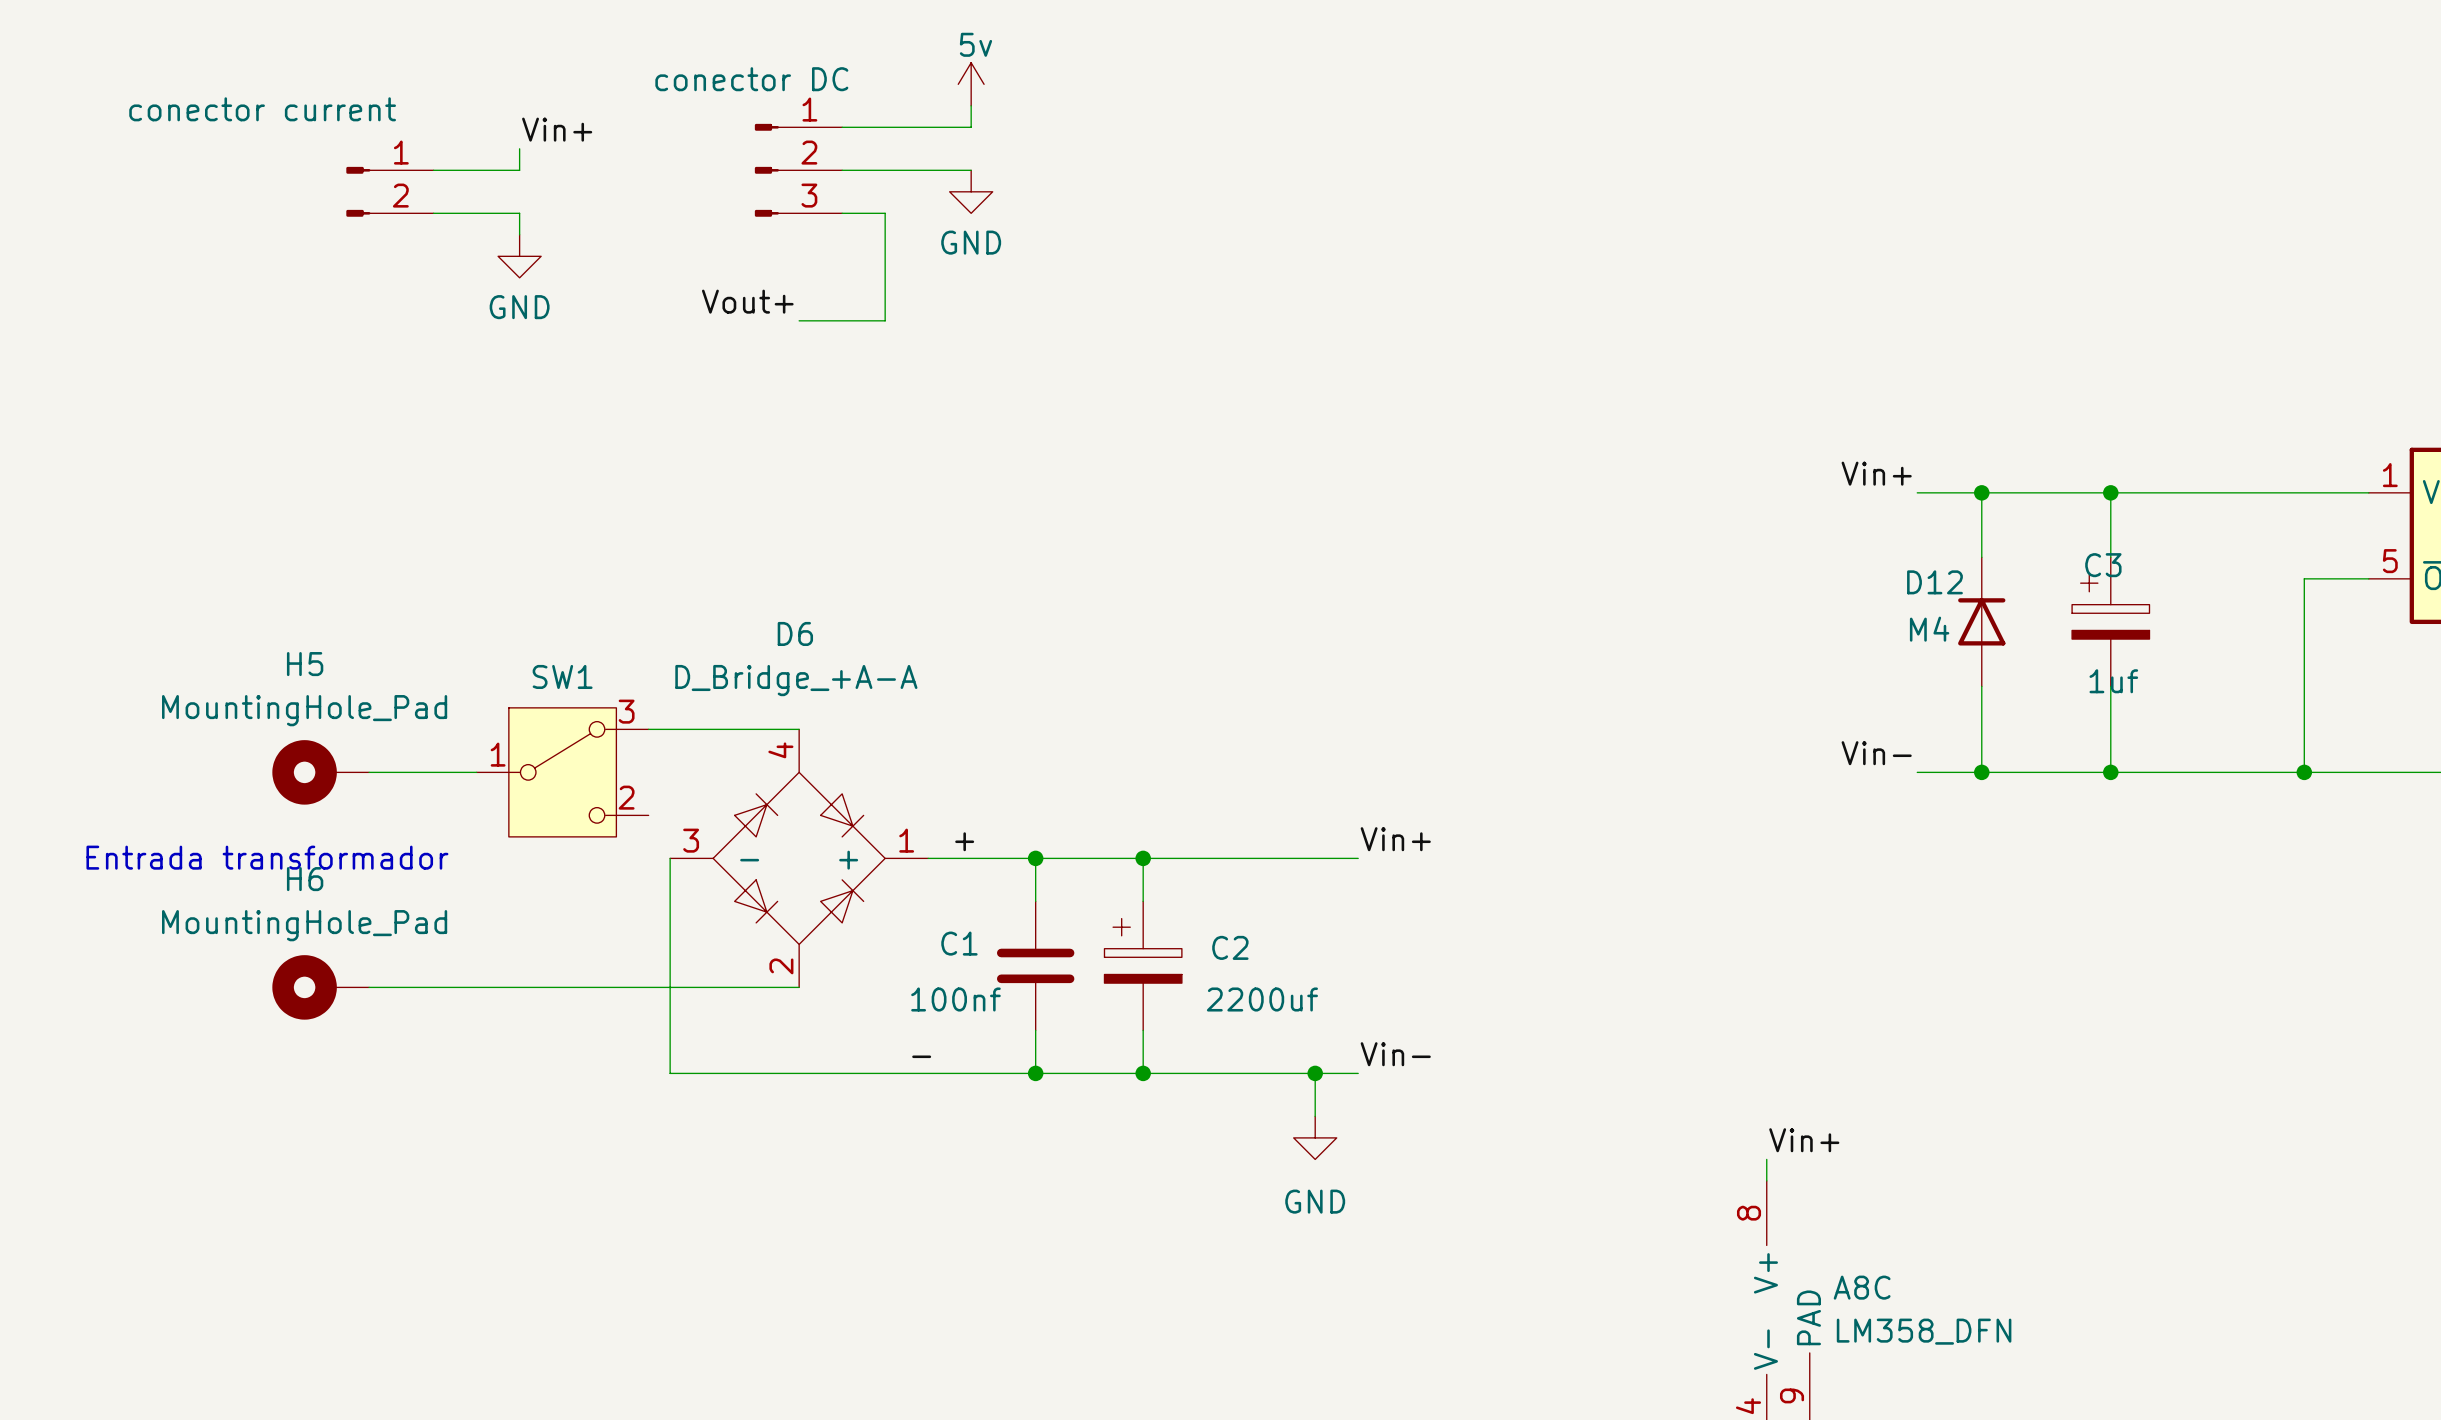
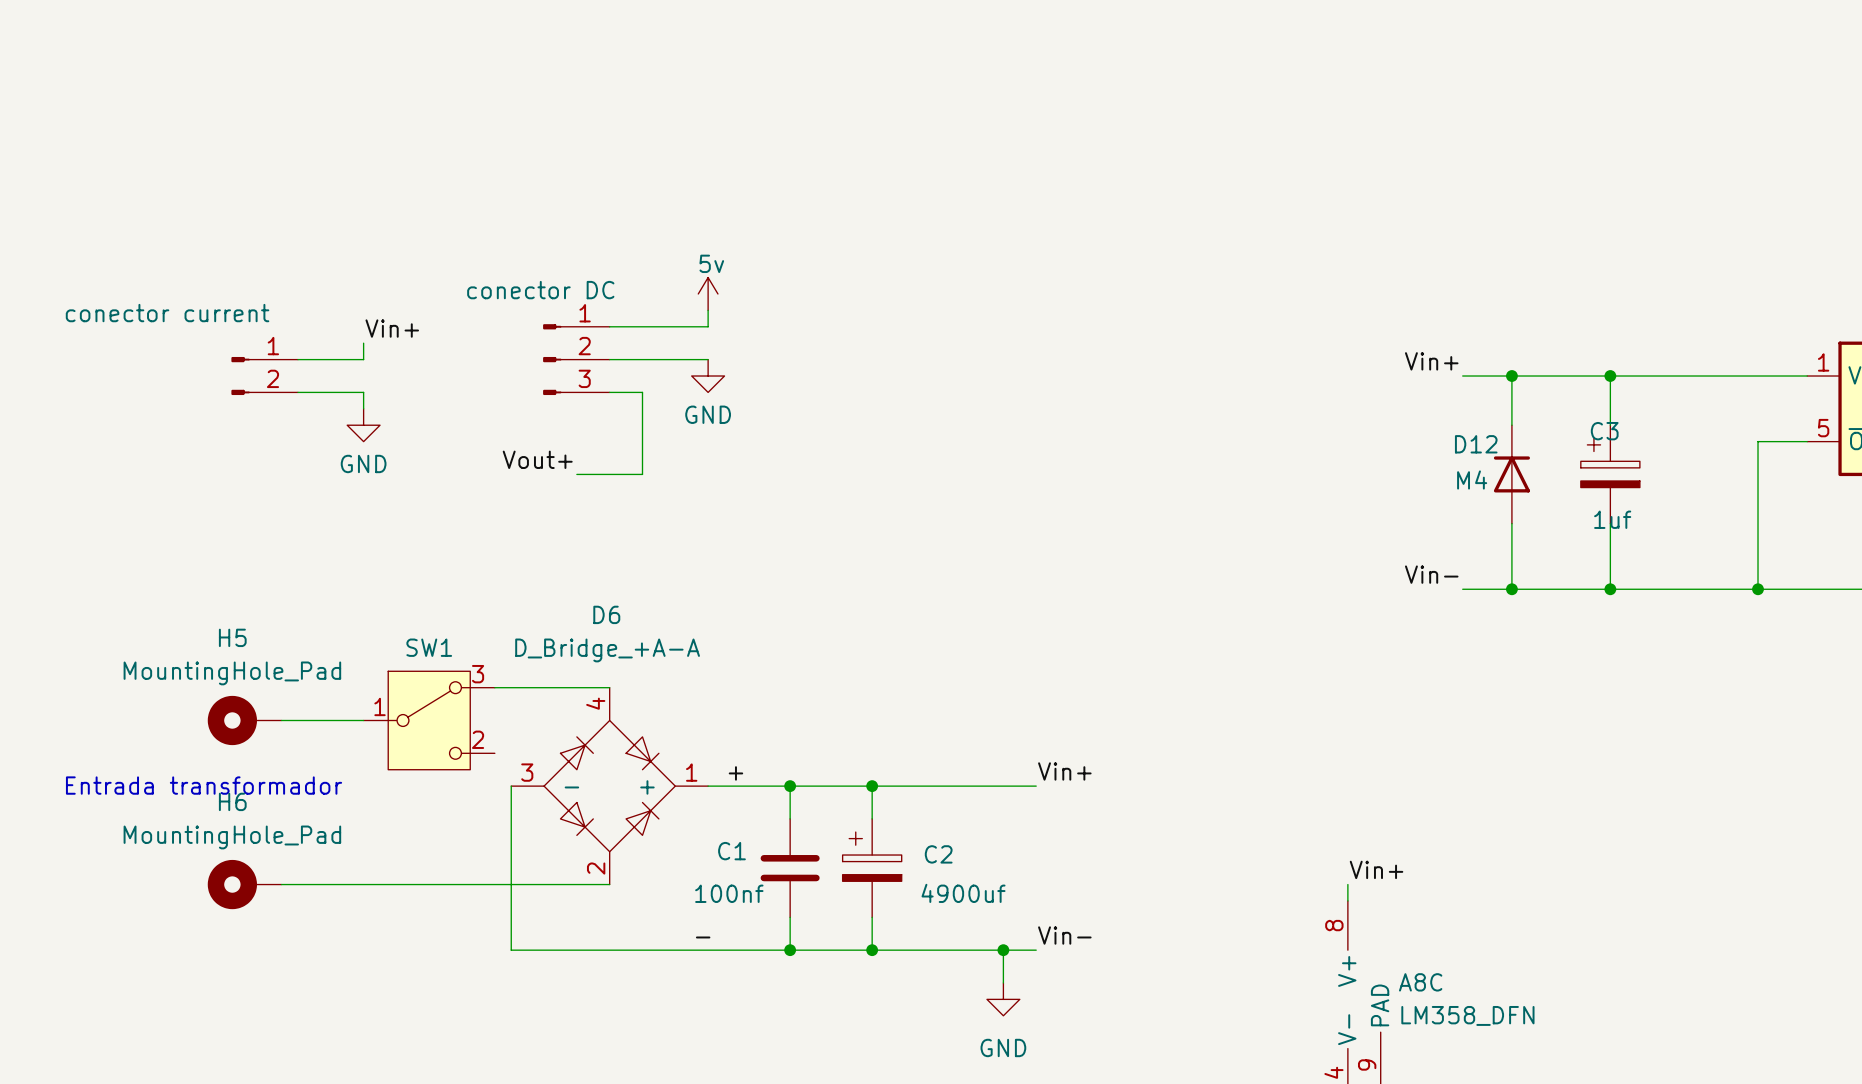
power symbol position: 5v (971, 84) -> 5v (708, 293)
wire: (971, 105) (971, 127) (842, 127) -> (708, 310) (708, 326) (609, 326)
label position: Vin+ (557, 129) -> Vin+ (392, 328)
wire: (519, 148) (519, 170) (433, 170) -> (363, 343) (363, 359) (298, 359)
part position: (798, 170) -> (576, 359)
wire: (842, 170) (971, 170) -> (609, 359) (708, 359)
part position: (389, 191) -> (264, 376)
power symbol: GND (971, 191) -> none
wire: (433, 213) (519, 213) (519, 234) -> (298, 392) (363, 392) (363, 408)
wire: (842, 213) (885, 213) (885, 320) (799, 320) -> (609, 392) (642, 392) (642, 474) (576, 474)
power symbol: GND (519, 256) -> none
label position: Vout+ (747, 301) -> Vout+ (537, 459)
power symbol: none -> GND (708, 376)
power symbol: none -> GND (363, 425)
wire: (648, 729) (799, 729) -> (494, 687) (609, 687)
H5 position: (320, 772) -> (244, 720)
wire: (369, 772) (476, 772) -> (281, 720) (363, 720)
SW1 position: (562, 772) -> (429, 720)
label position: Vin+ (1395, 839) -> Vin+ (1064, 771)
label position: + (964, 841) -> + (735, 773)
text position: Entrada transformador (267, 857) -> Entrada transformador (204, 785)
wire: (670, 858) (670, 1030) -> none
D6 position: (799, 858) -> (609, 786)
wire: (928, 858) (1358, 858) -> (708, 786) (1036, 786)
wire: (1035, 858) (1035, 901) -> (790, 917) (790, 950)
junction: (1035, 858) -> none
wire: (1143, 858) (1143, 901) -> (872, 917) (872, 950)
junction: (1143, 858) -> none
C1 position: (1035, 965) -> (790, 868)
C2 position: (1143, 965) -> (872, 868)
H6 position: (320, 987) -> (244, 884)
wire: (369, 987) (799, 987) -> (281, 884) (609, 884)
C2 value: 2200uf (1262, 999) -> 4900uf (963, 893)
label position: Vin- (1395, 1054) -> Vin- (1064, 935)
label position: - (921, 1056) -> - (703, 937)
wire: (670, 1073) (1358, 1073) -> (511, 818) (511, 950) (1036, 950)
junction position: (1035, 1073) -> (790, 786)
junction position: (1143, 1073) -> (872, 786)
wire: (1315, 1073) (1315, 1116) -> (1003, 950) (1003, 982)
junction: (1315, 1073) -> none
power symbol position: GND (1315, 1137) -> GND (1003, 999)
junction: none -> (790, 950)
junction: none -> (872, 950)
junction: none -> (1003, 950)

